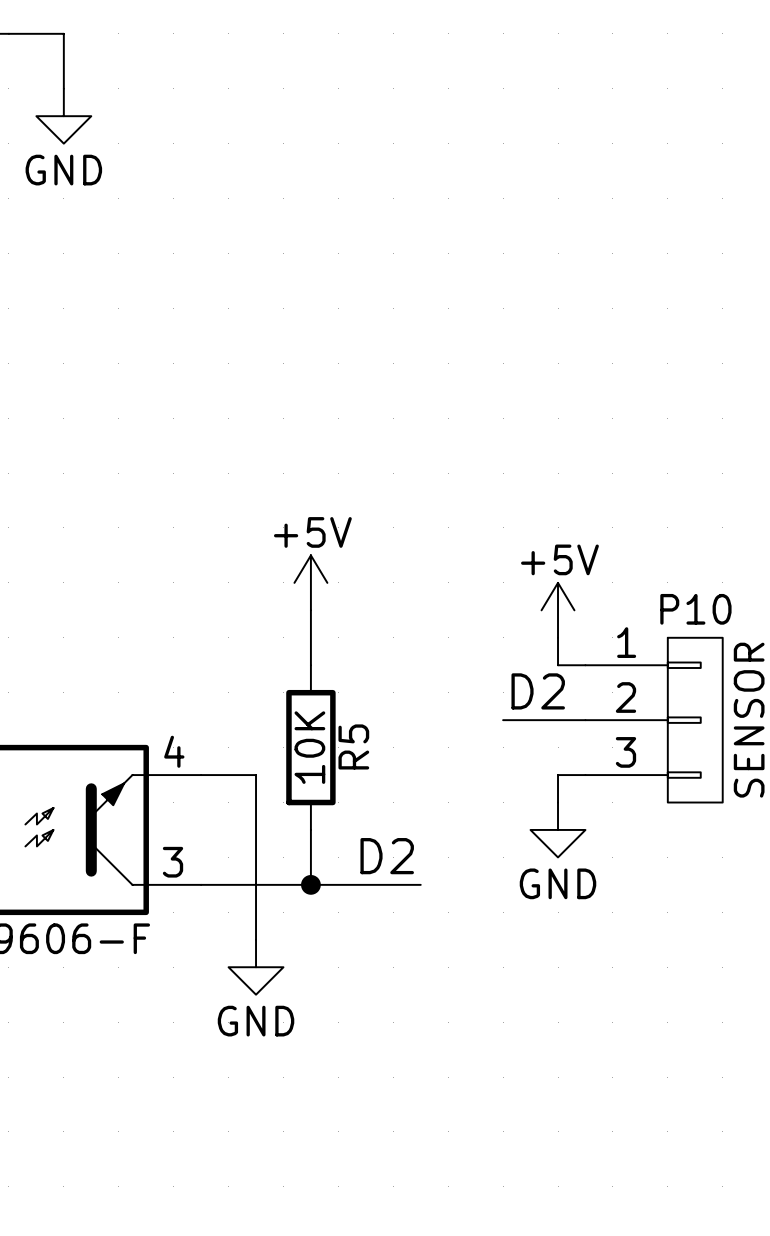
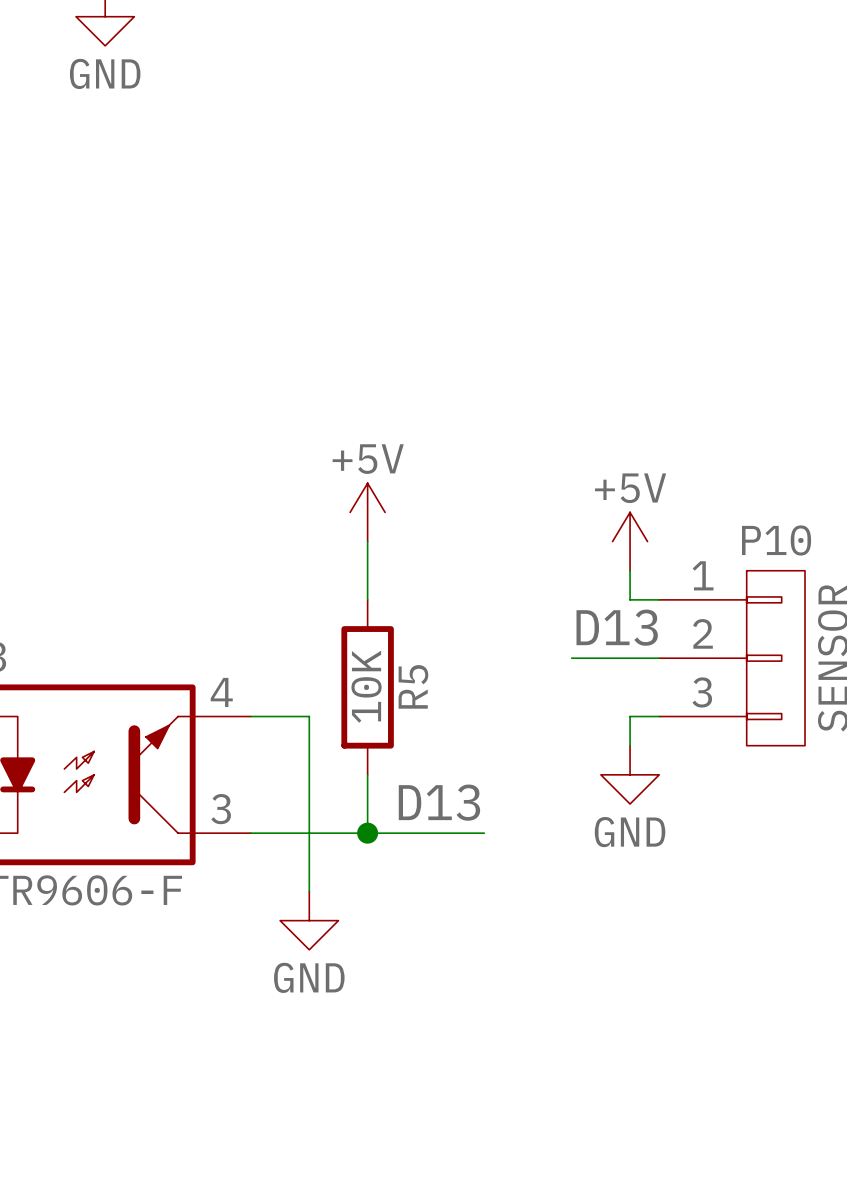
label: D2 (538, 691) -> D13 (617, 627)
label: D2 (387, 856) -> D13 (439, 802)

